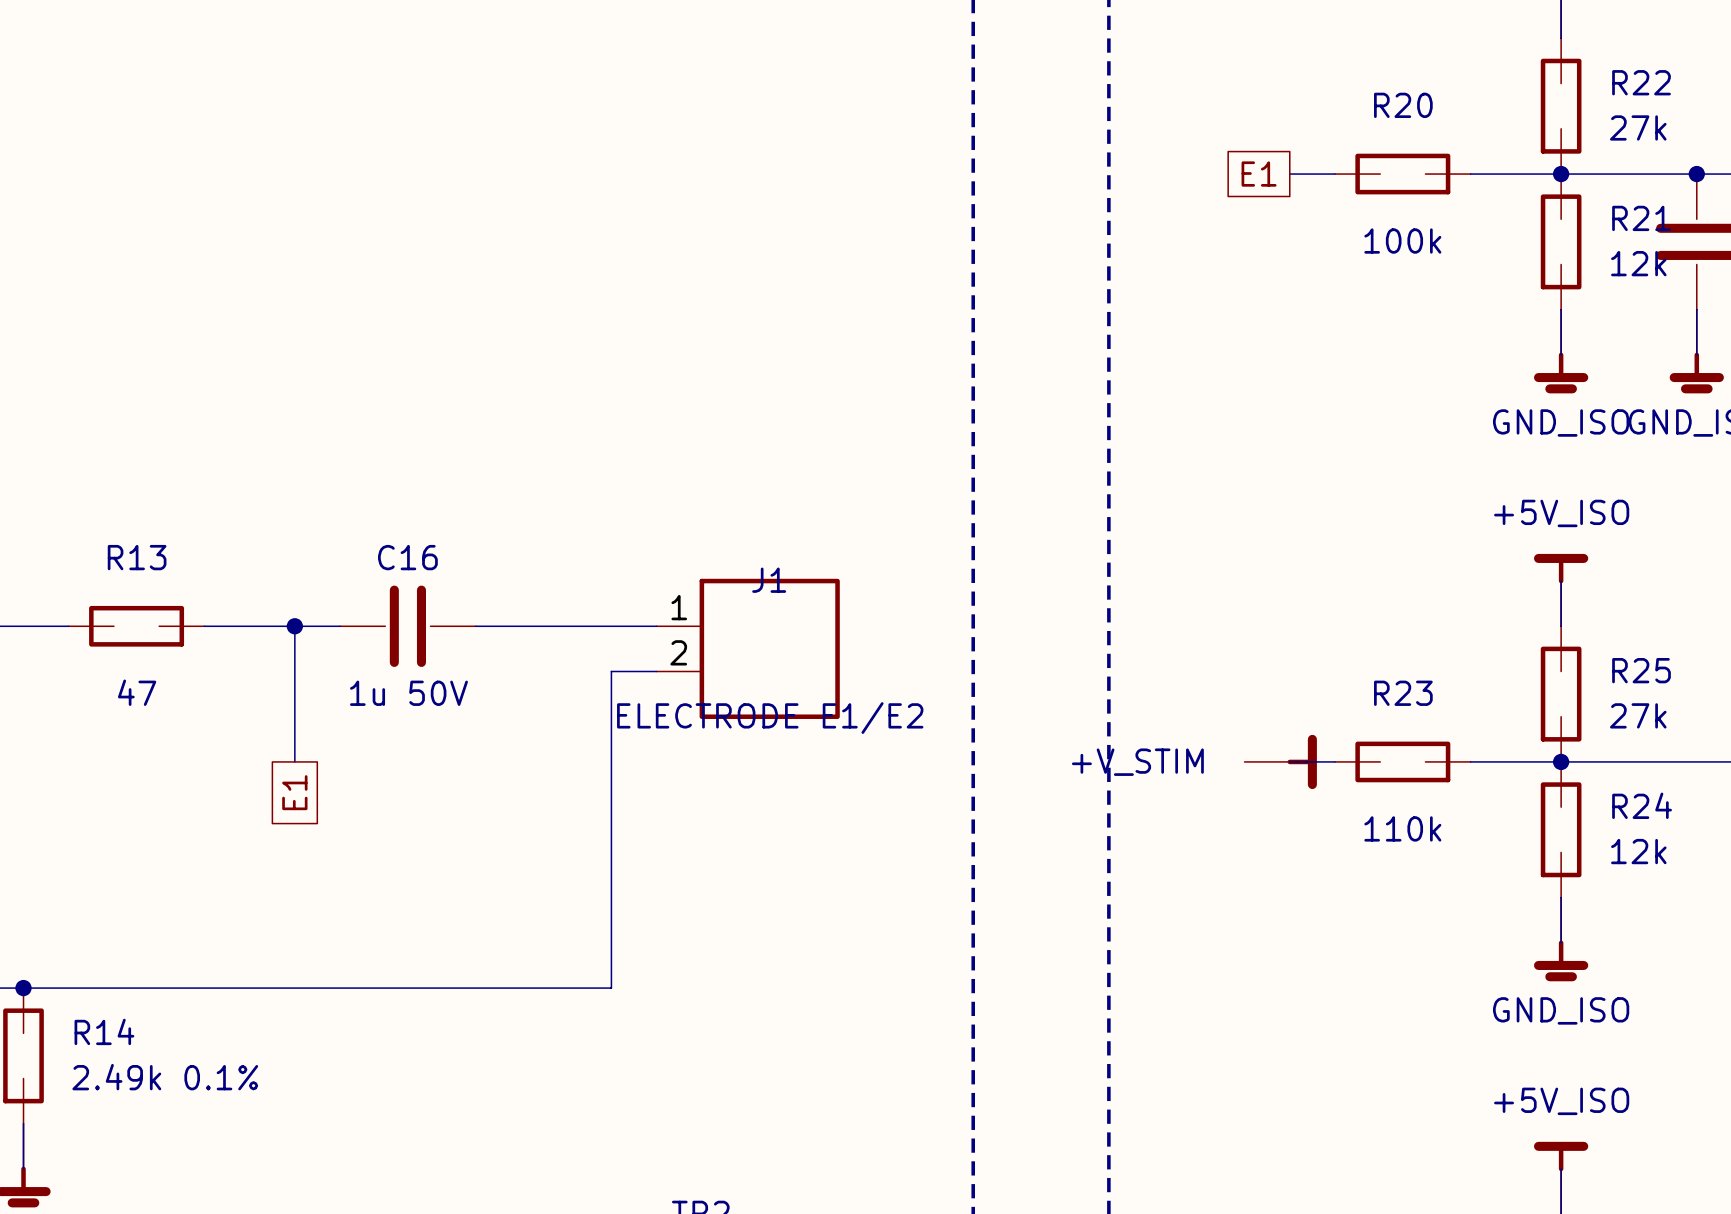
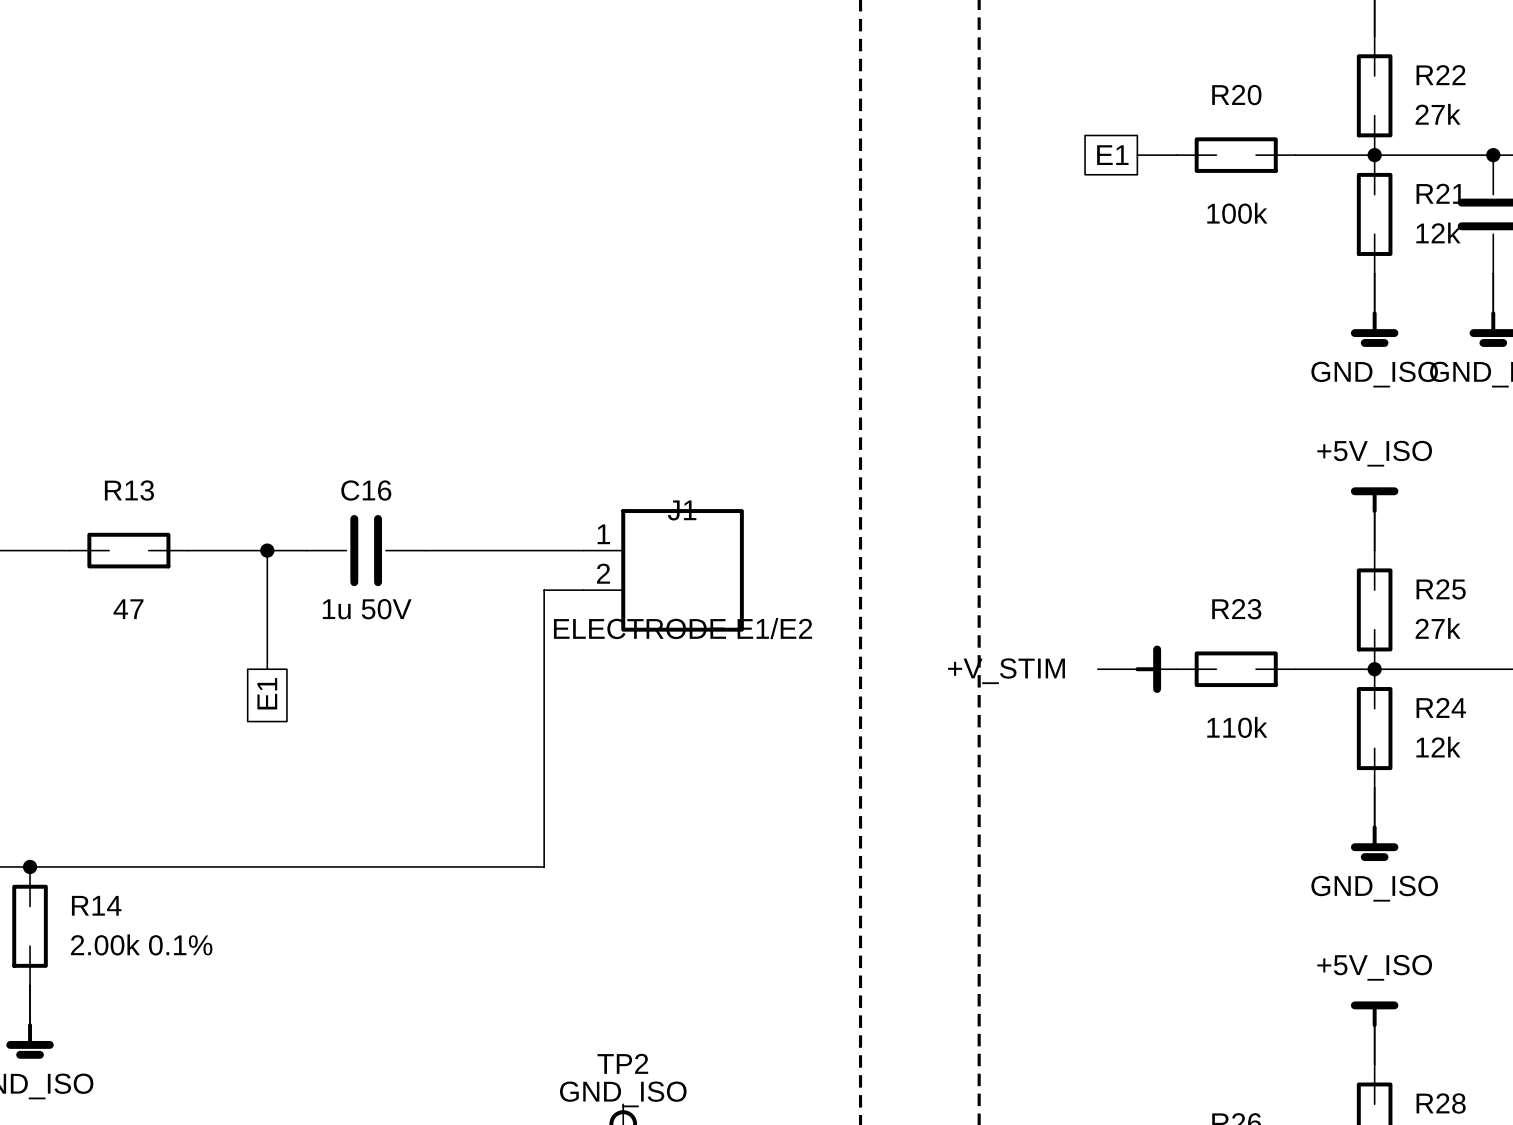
R14 value: 2.49k 0.1% (165, 1077) -> 2.00k 0.1% (141, 944)

